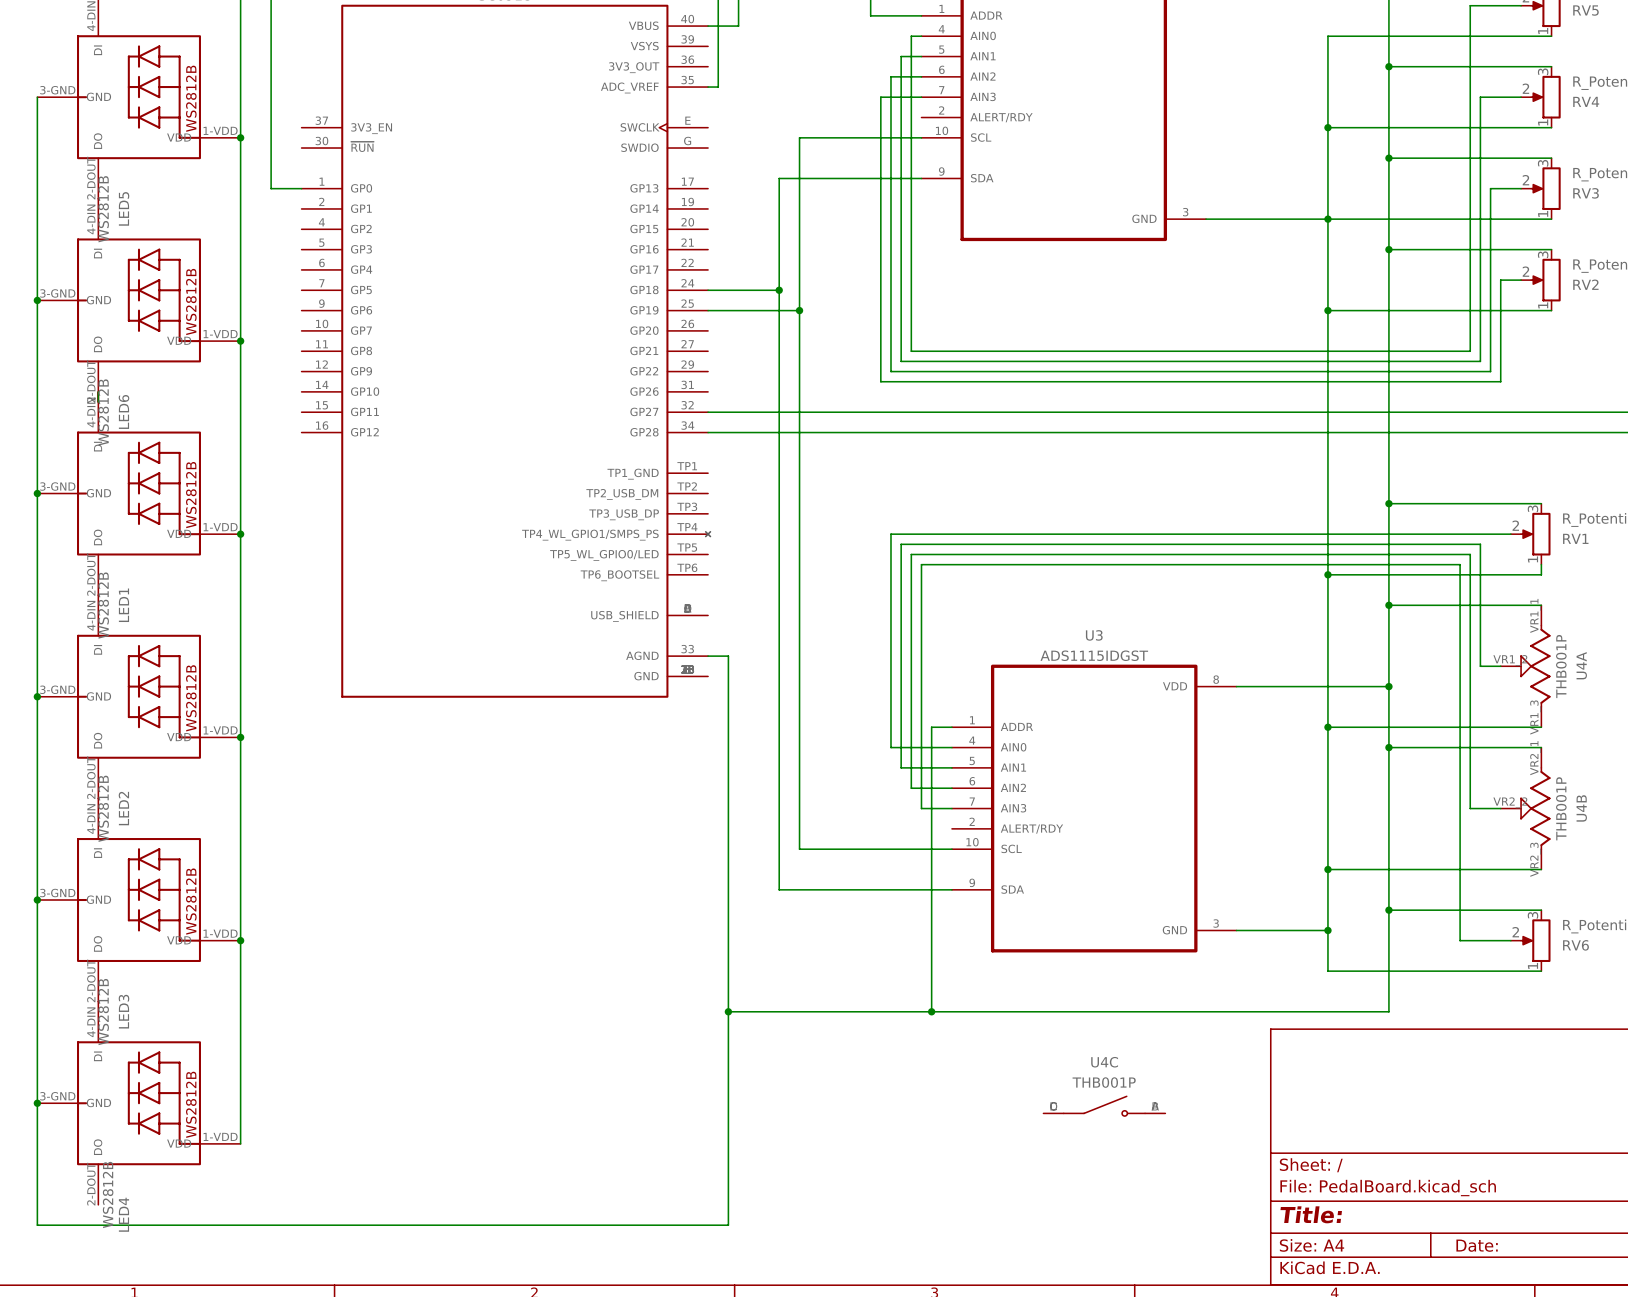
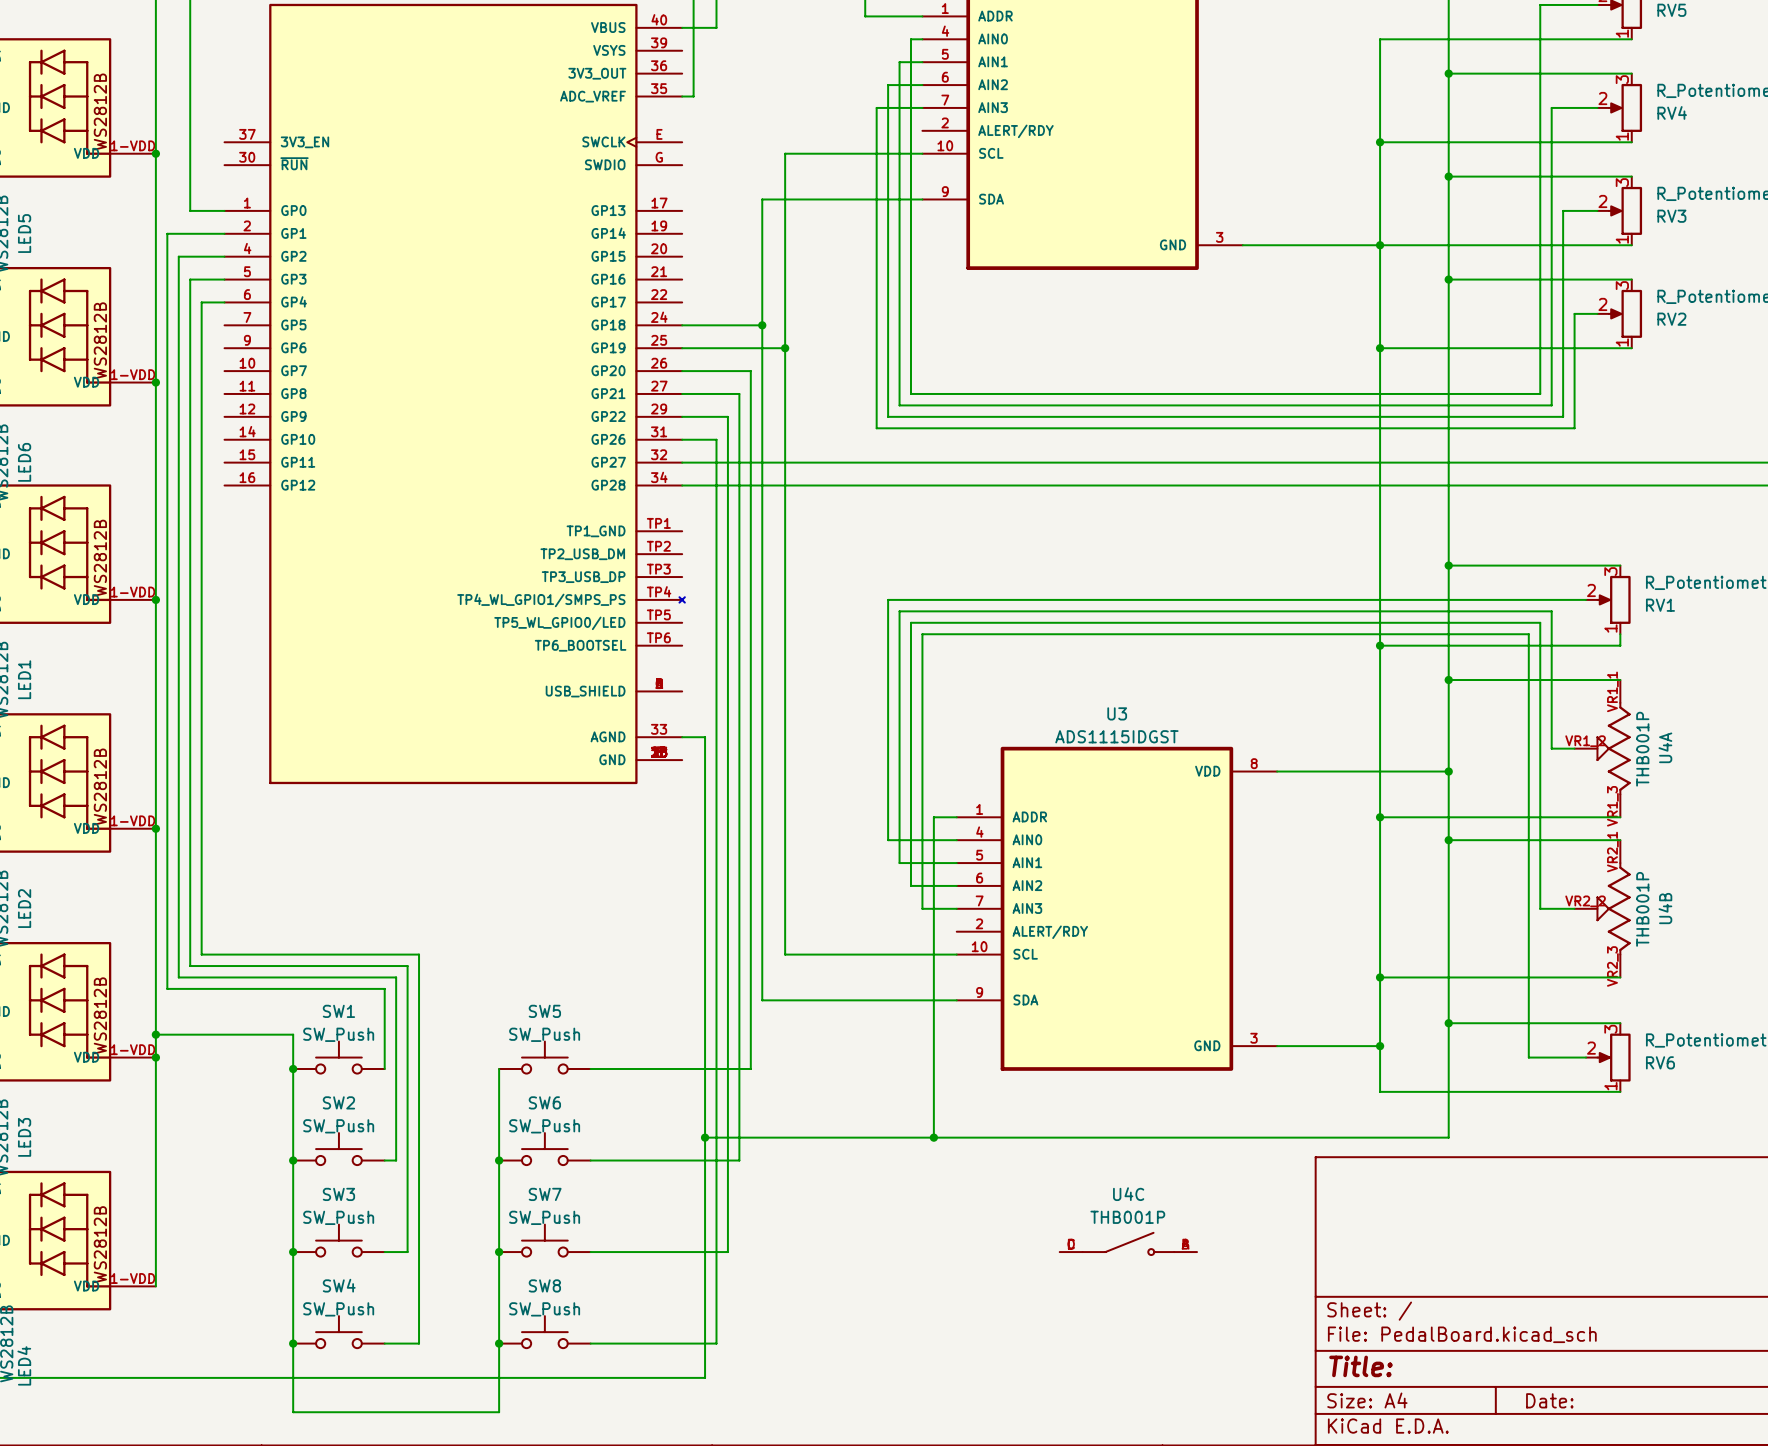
wire: none -> (224, 233) (167, 233) (167, 988) (384, 988) (384, 1068)
wire: none -> (224, 256) (178, 256) (178, 977) (396, 977) (396, 1160) (384, 1160)
wire: none -> (224, 279) (190, 279) (190, 966) (407, 966) (407, 1252) (384, 1252)
wire: none -> (224, 302) (201, 302) (201, 954) (419, 954) (419, 1343) (384, 1343)
wire: none -> (682, 371) (750, 371) (750, 1068) (590, 1068)
wire: none -> (682, 393) (739, 393) (739, 1160) (590, 1160)
wire: none -> (682, 416) (727, 416) (727, 1252) (590, 1252)
wire: none -> (682, 439) (716, 439) (716, 1343) (590, 1343)
wire: none -> (155, 1034) (293, 1034) (293, 1412) (499, 1412) (499, 1068)
junction: none -> (155, 1034)
SW1: none -> SW_Push (338, 1057)
SW5: none -> SW_Push (544, 1057)
junction: none -> (293, 1068)
SW2: none -> SW_Push (338, 1149)
SW6: none -> SW_Push (544, 1149)
junction: none -> (293, 1160)
junction: none -> (499, 1160)
SW3: none -> SW_Push (338, 1240)
SW7: none -> SW_Push (544, 1240)
junction: none -> (293, 1252)
junction: none -> (499, 1252)
SW4: none -> SW_Push (338, 1332)
SW8: none -> SW_Push (544, 1332)
junction: none -> (293, 1343)
junction: none -> (499, 1343)

